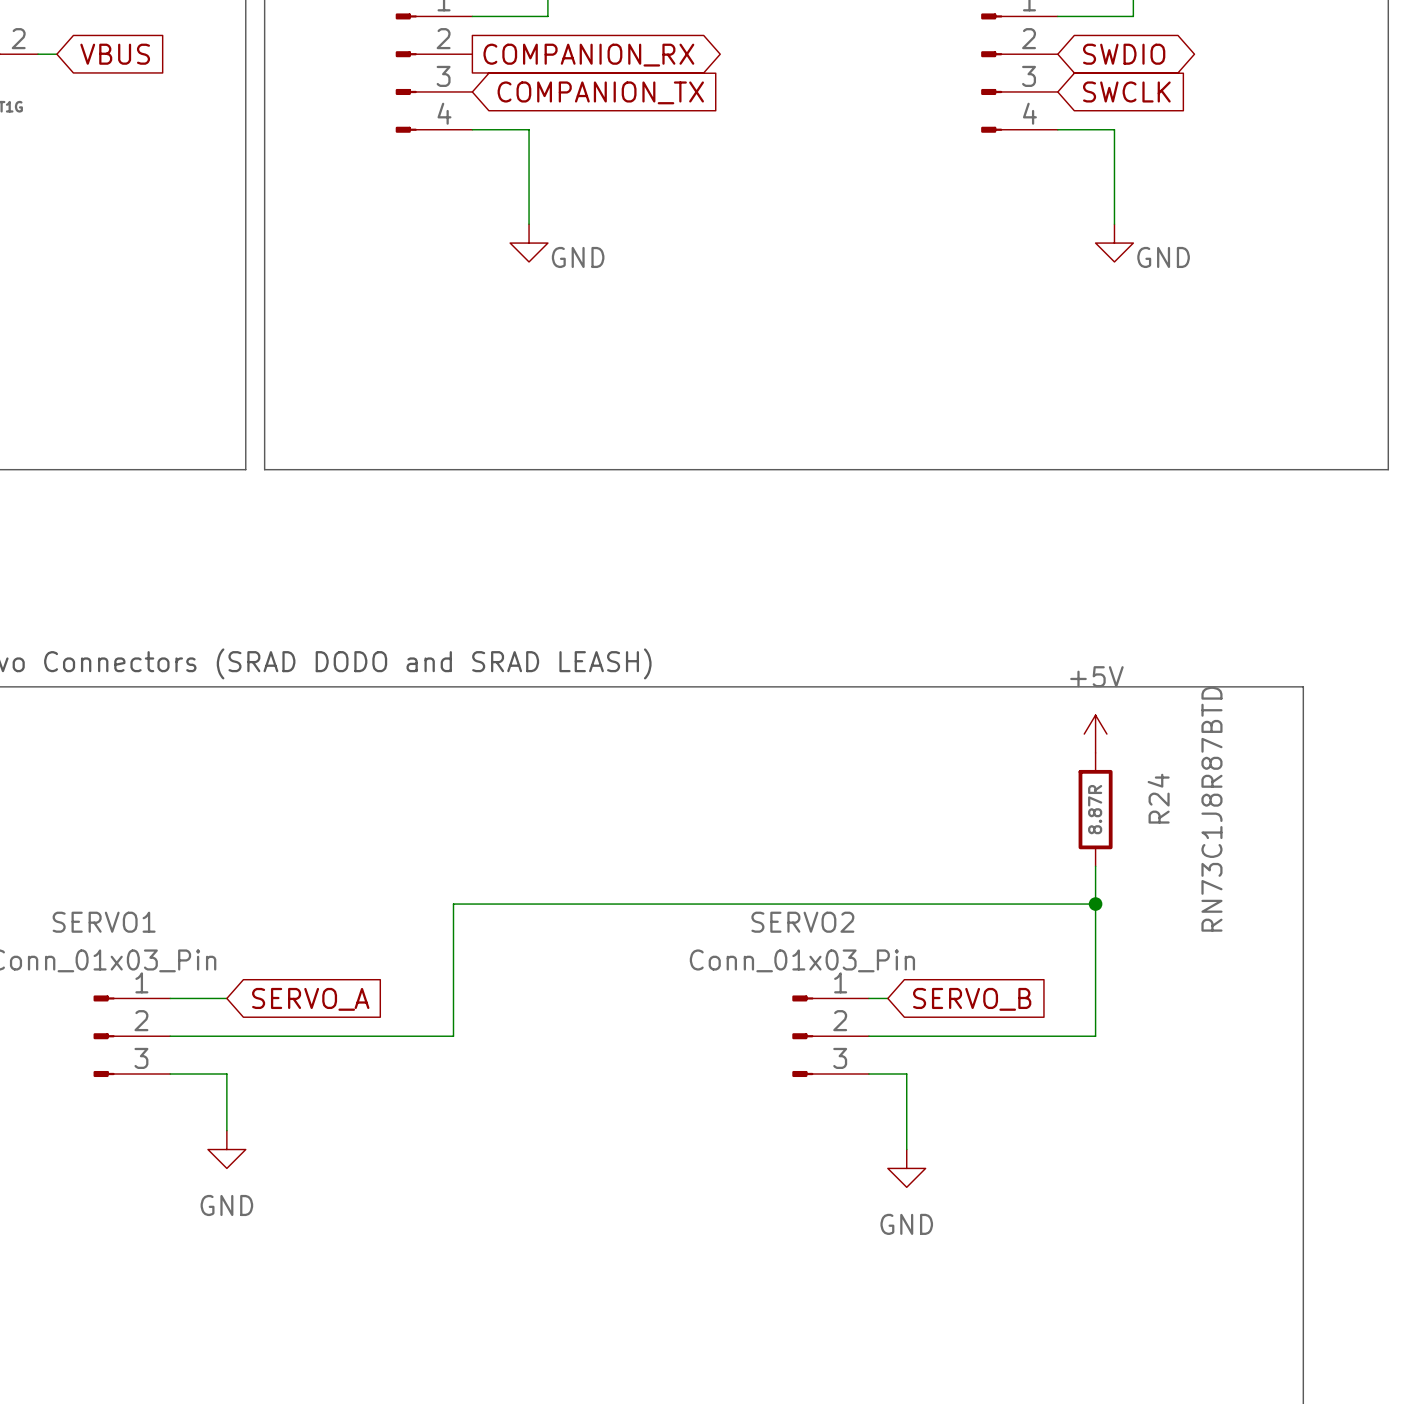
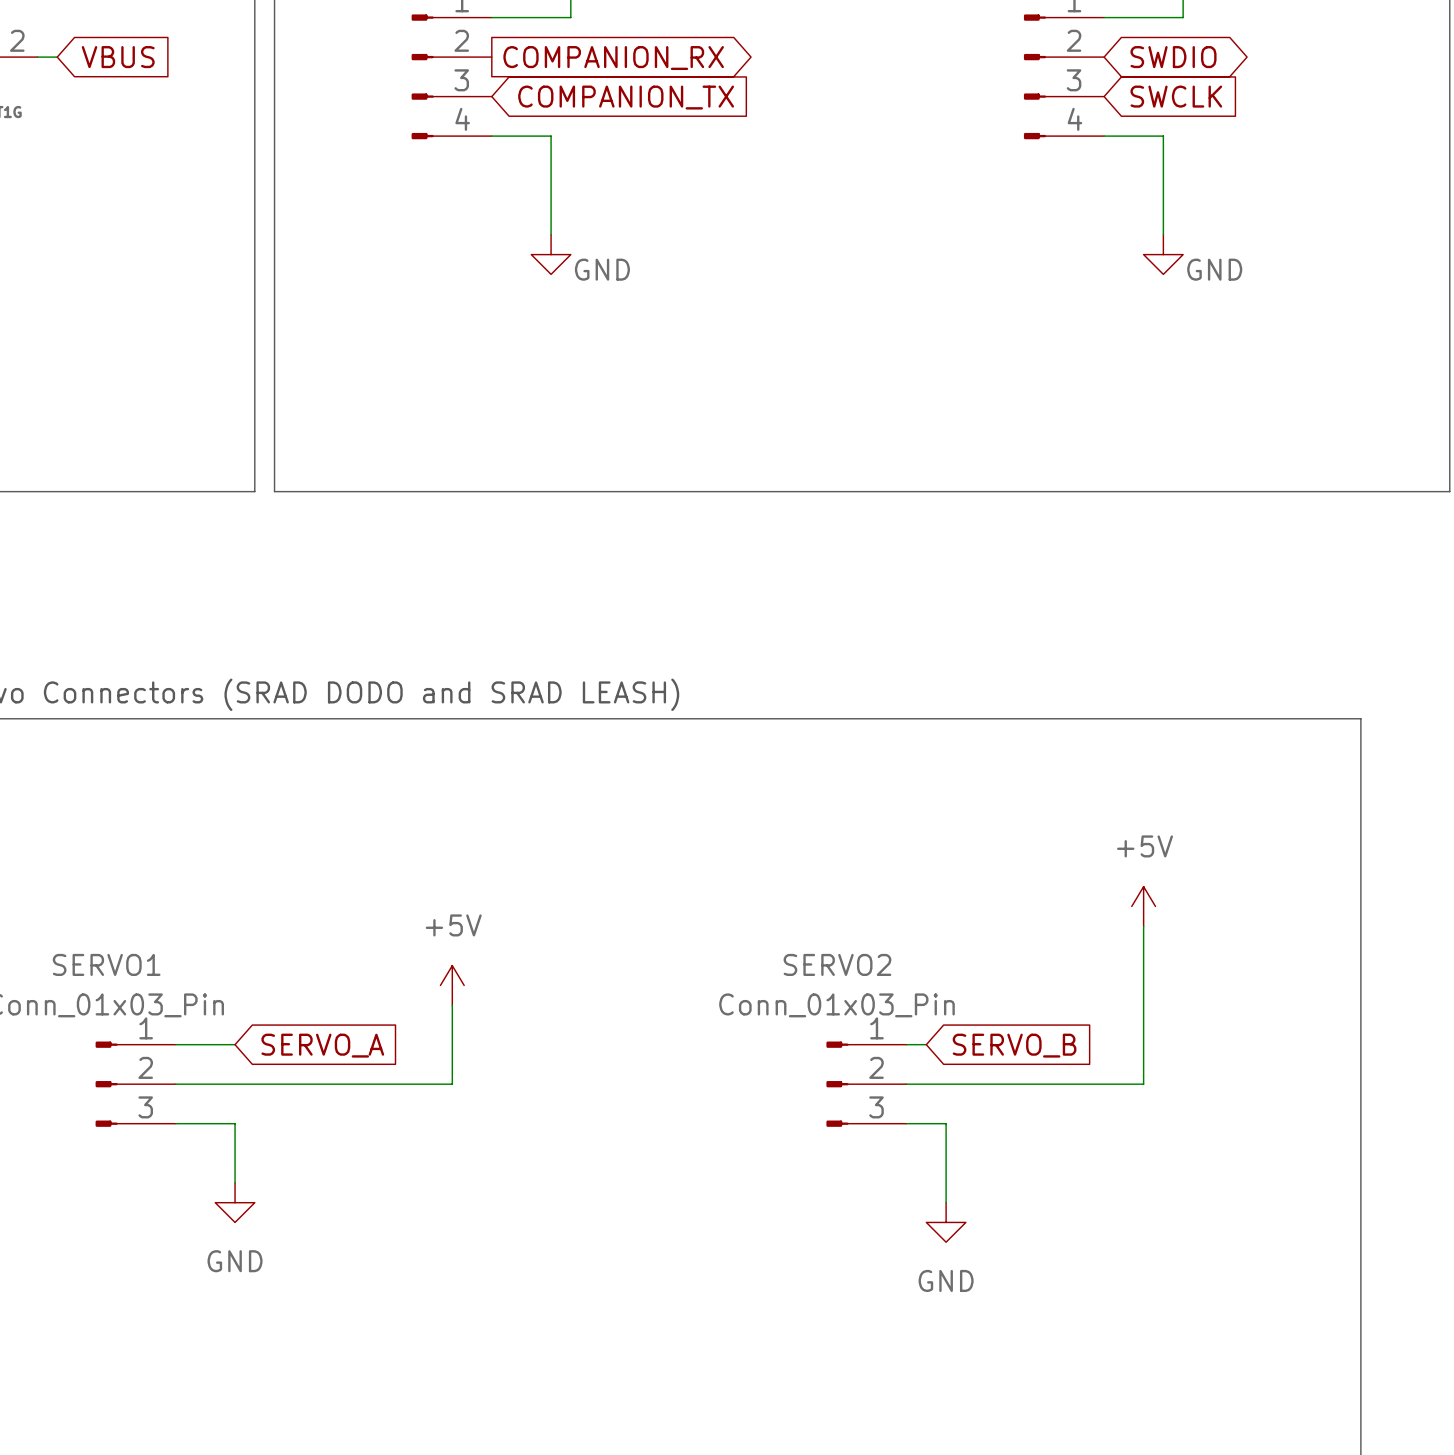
power symbol position: +5V (1095, 734) -> +5V (1143, 906)
R24: 8.87R (1095, 809) -> none
wire: (1095, 904) (453, 904) (453, 1036) (434, 1036) -> (452, 1005) (452, 1084)
junction: (1095, 904) -> none
power symbol: none -> +5V (452, 985)

